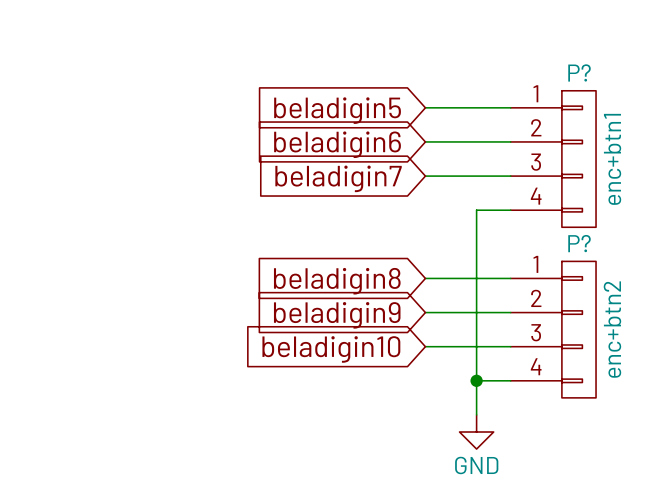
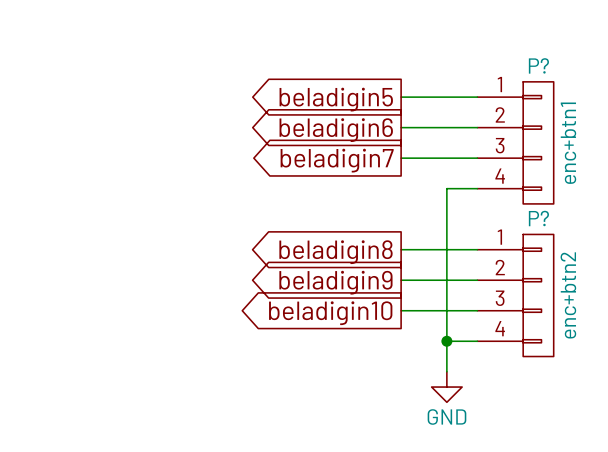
global label shape: input (337, 110) -> output (336, 99)
global label shape: input (337, 144) -> output (336, 130)
global label shape: input (338, 178) -> output (337, 160)
global label shape: input (337, 281) -> output (336, 252)
global label shape: input (337, 315) -> output (335, 282)
global label shape: input (331, 349) -> output (330, 313)

